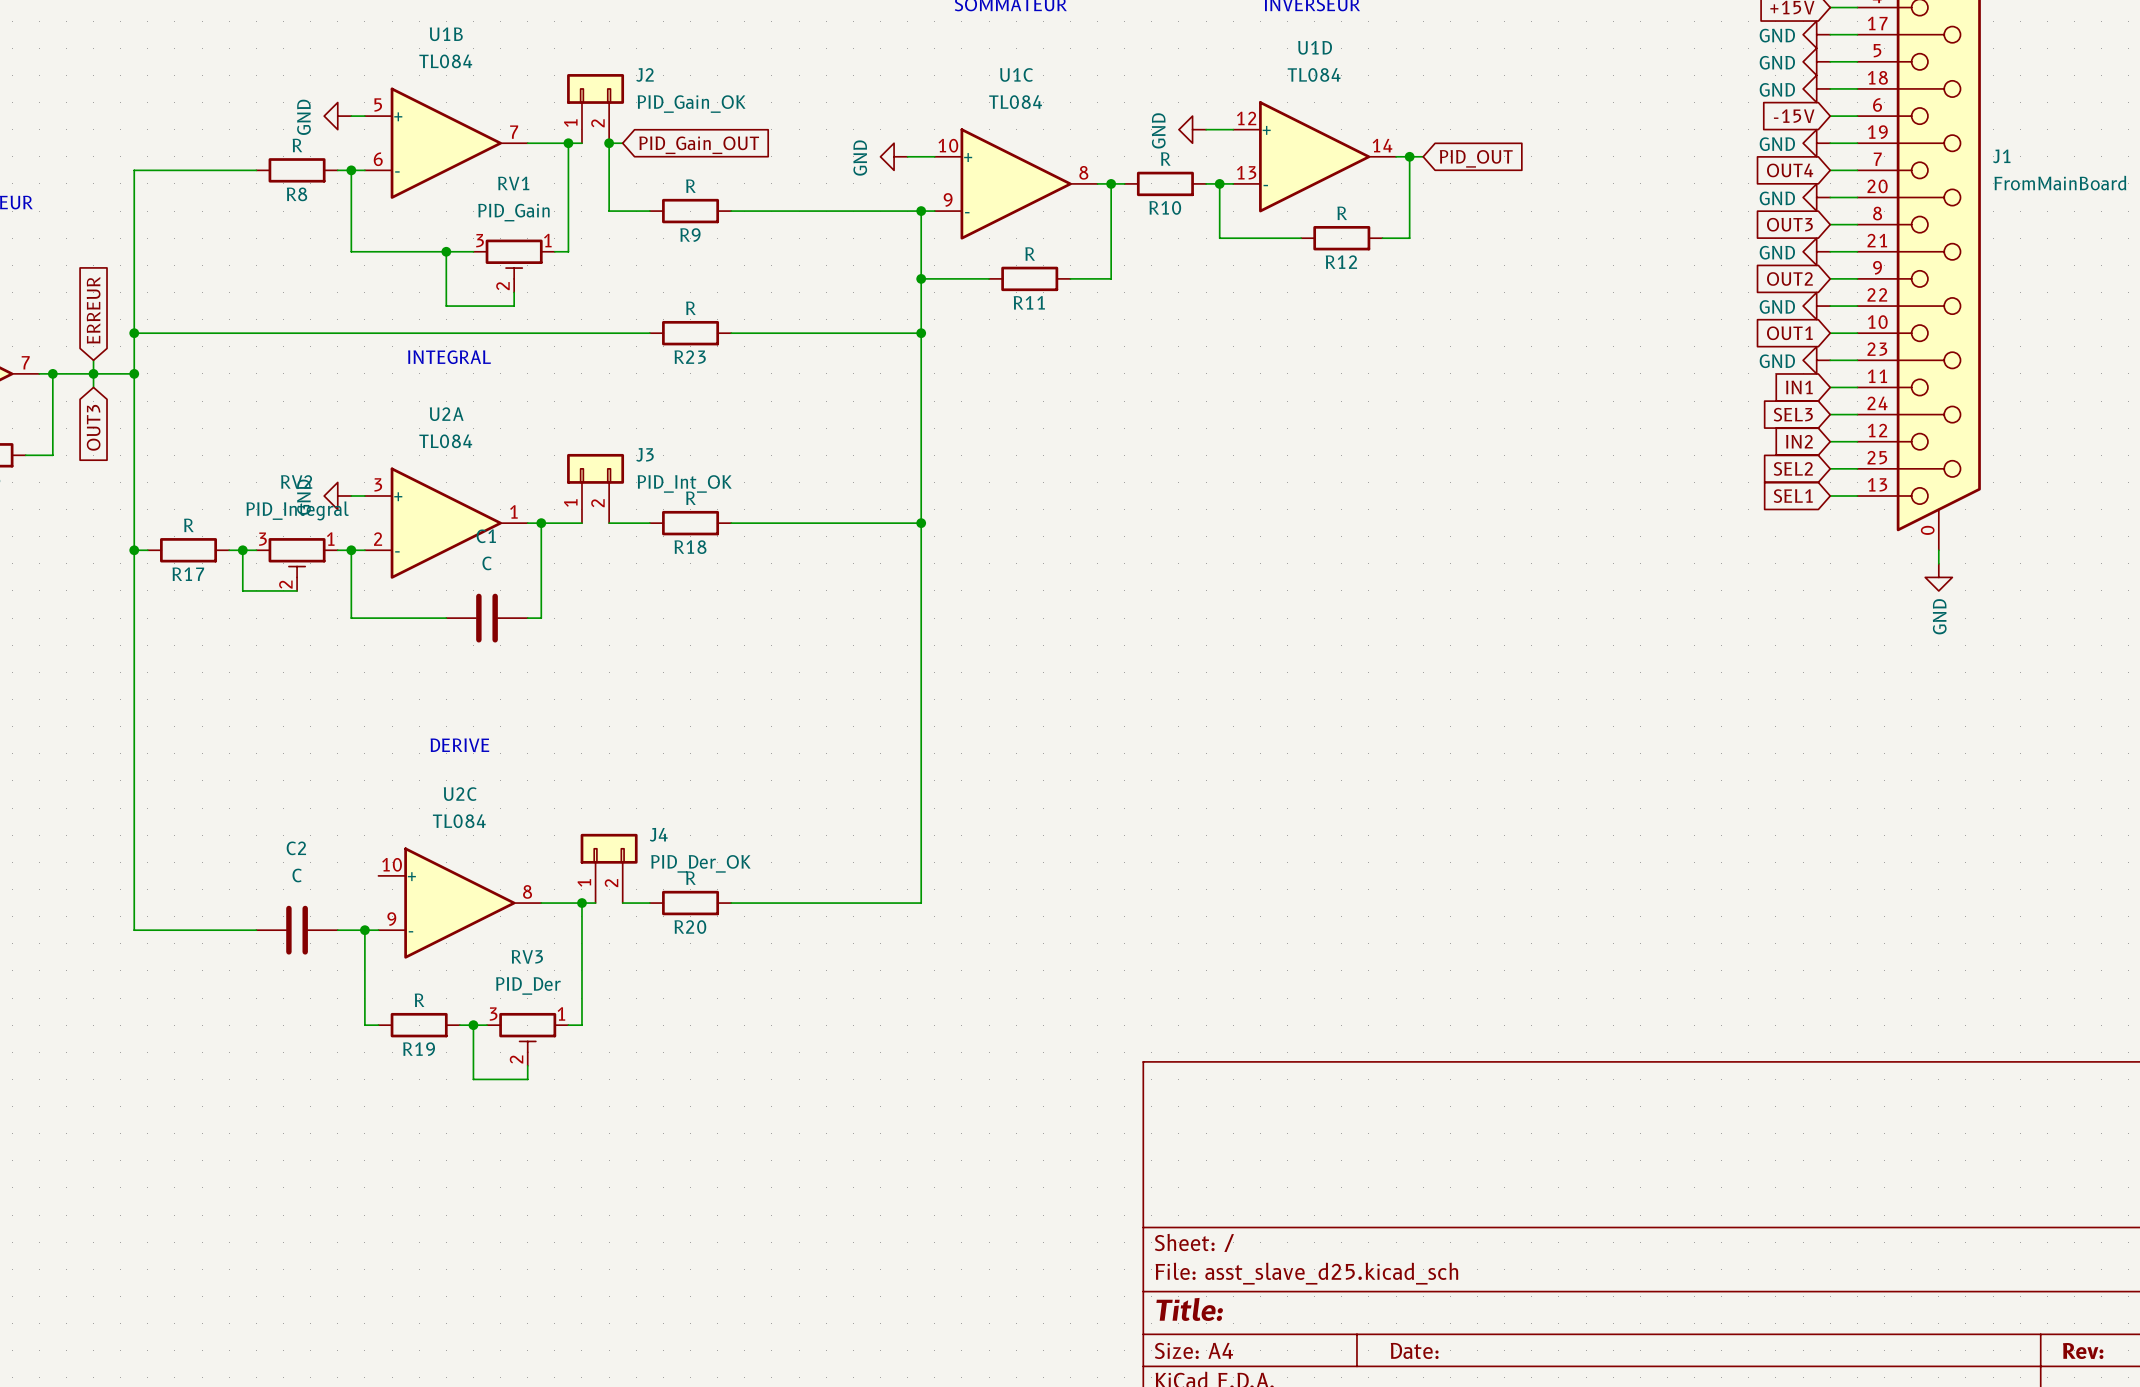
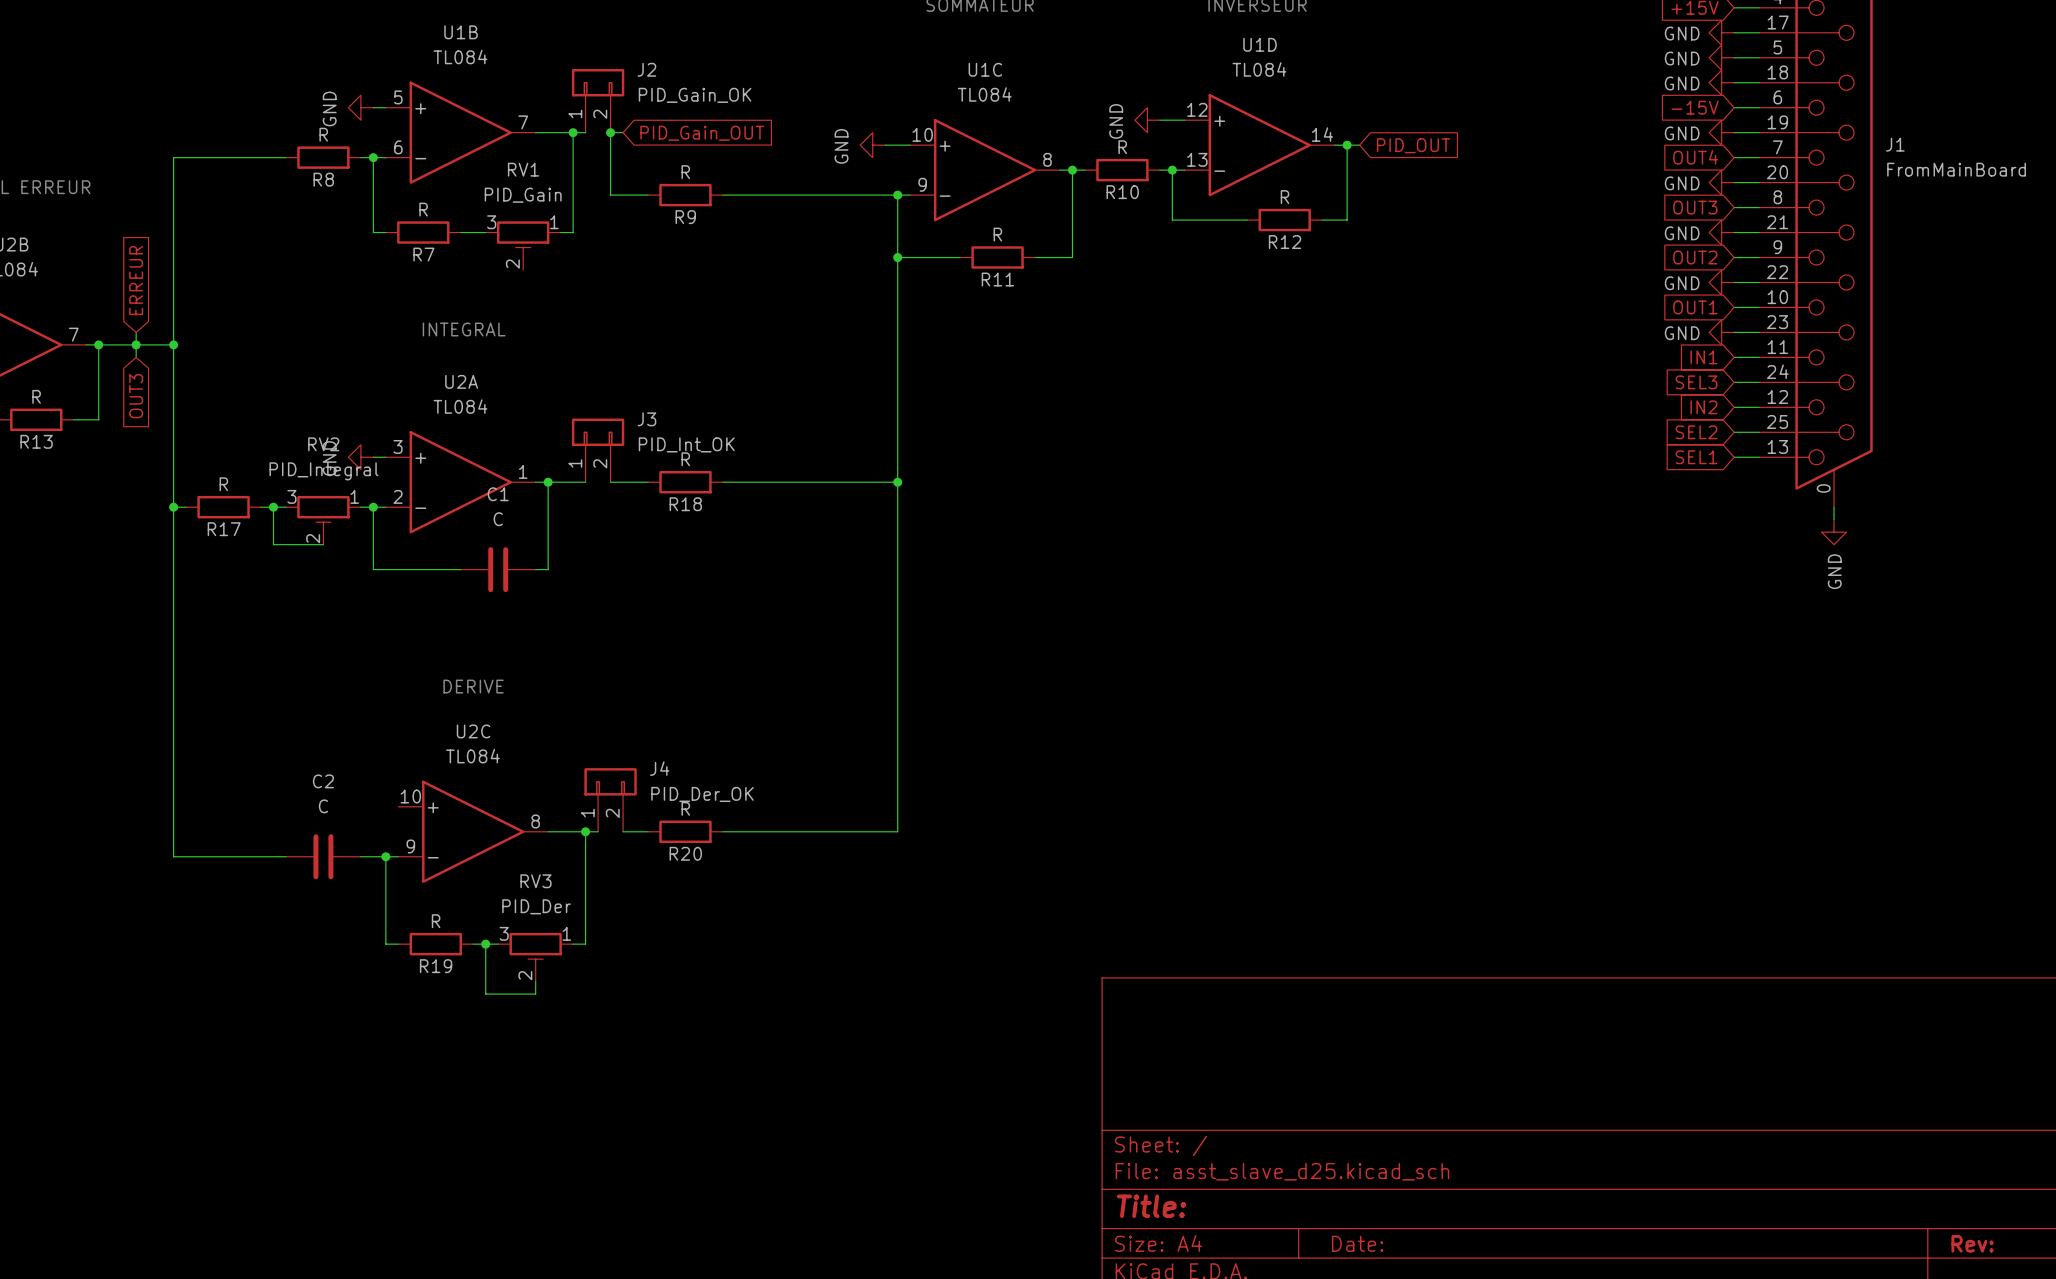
wire: (364, 251) (446, 251) (446, 306) (514, 306) (514, 292) -> none
R7: none -> R (423, 232)
junction: (446, 251) -> none
wire: (134, 333) (649, 333) -> none
junction: (134, 333) -> none
R23: R (690, 333) -> none
wire: (731, 333) (921, 333) -> none
junction: (921, 333) -> none

